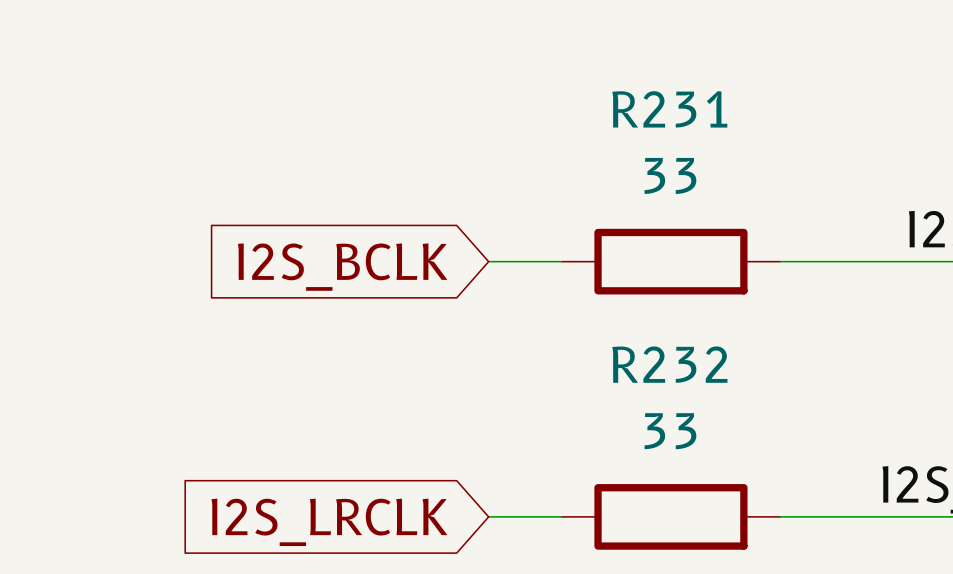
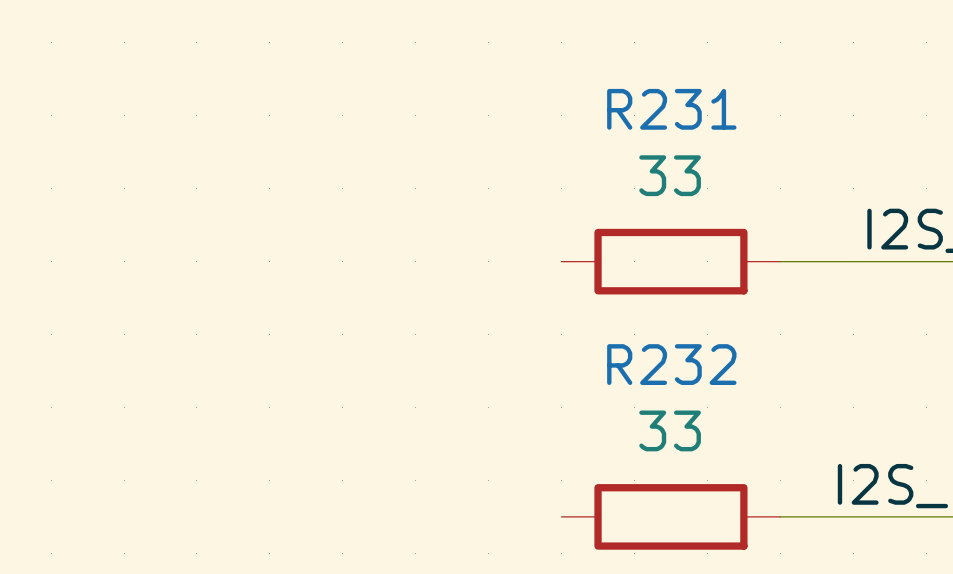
wire: (488, 261) (561, 261) -> none
global label: I2S_BCLK (342, 267) -> none
wire: (488, 516) (561, 516) -> none
global label: I2S_LRCLK (329, 522) -> none

